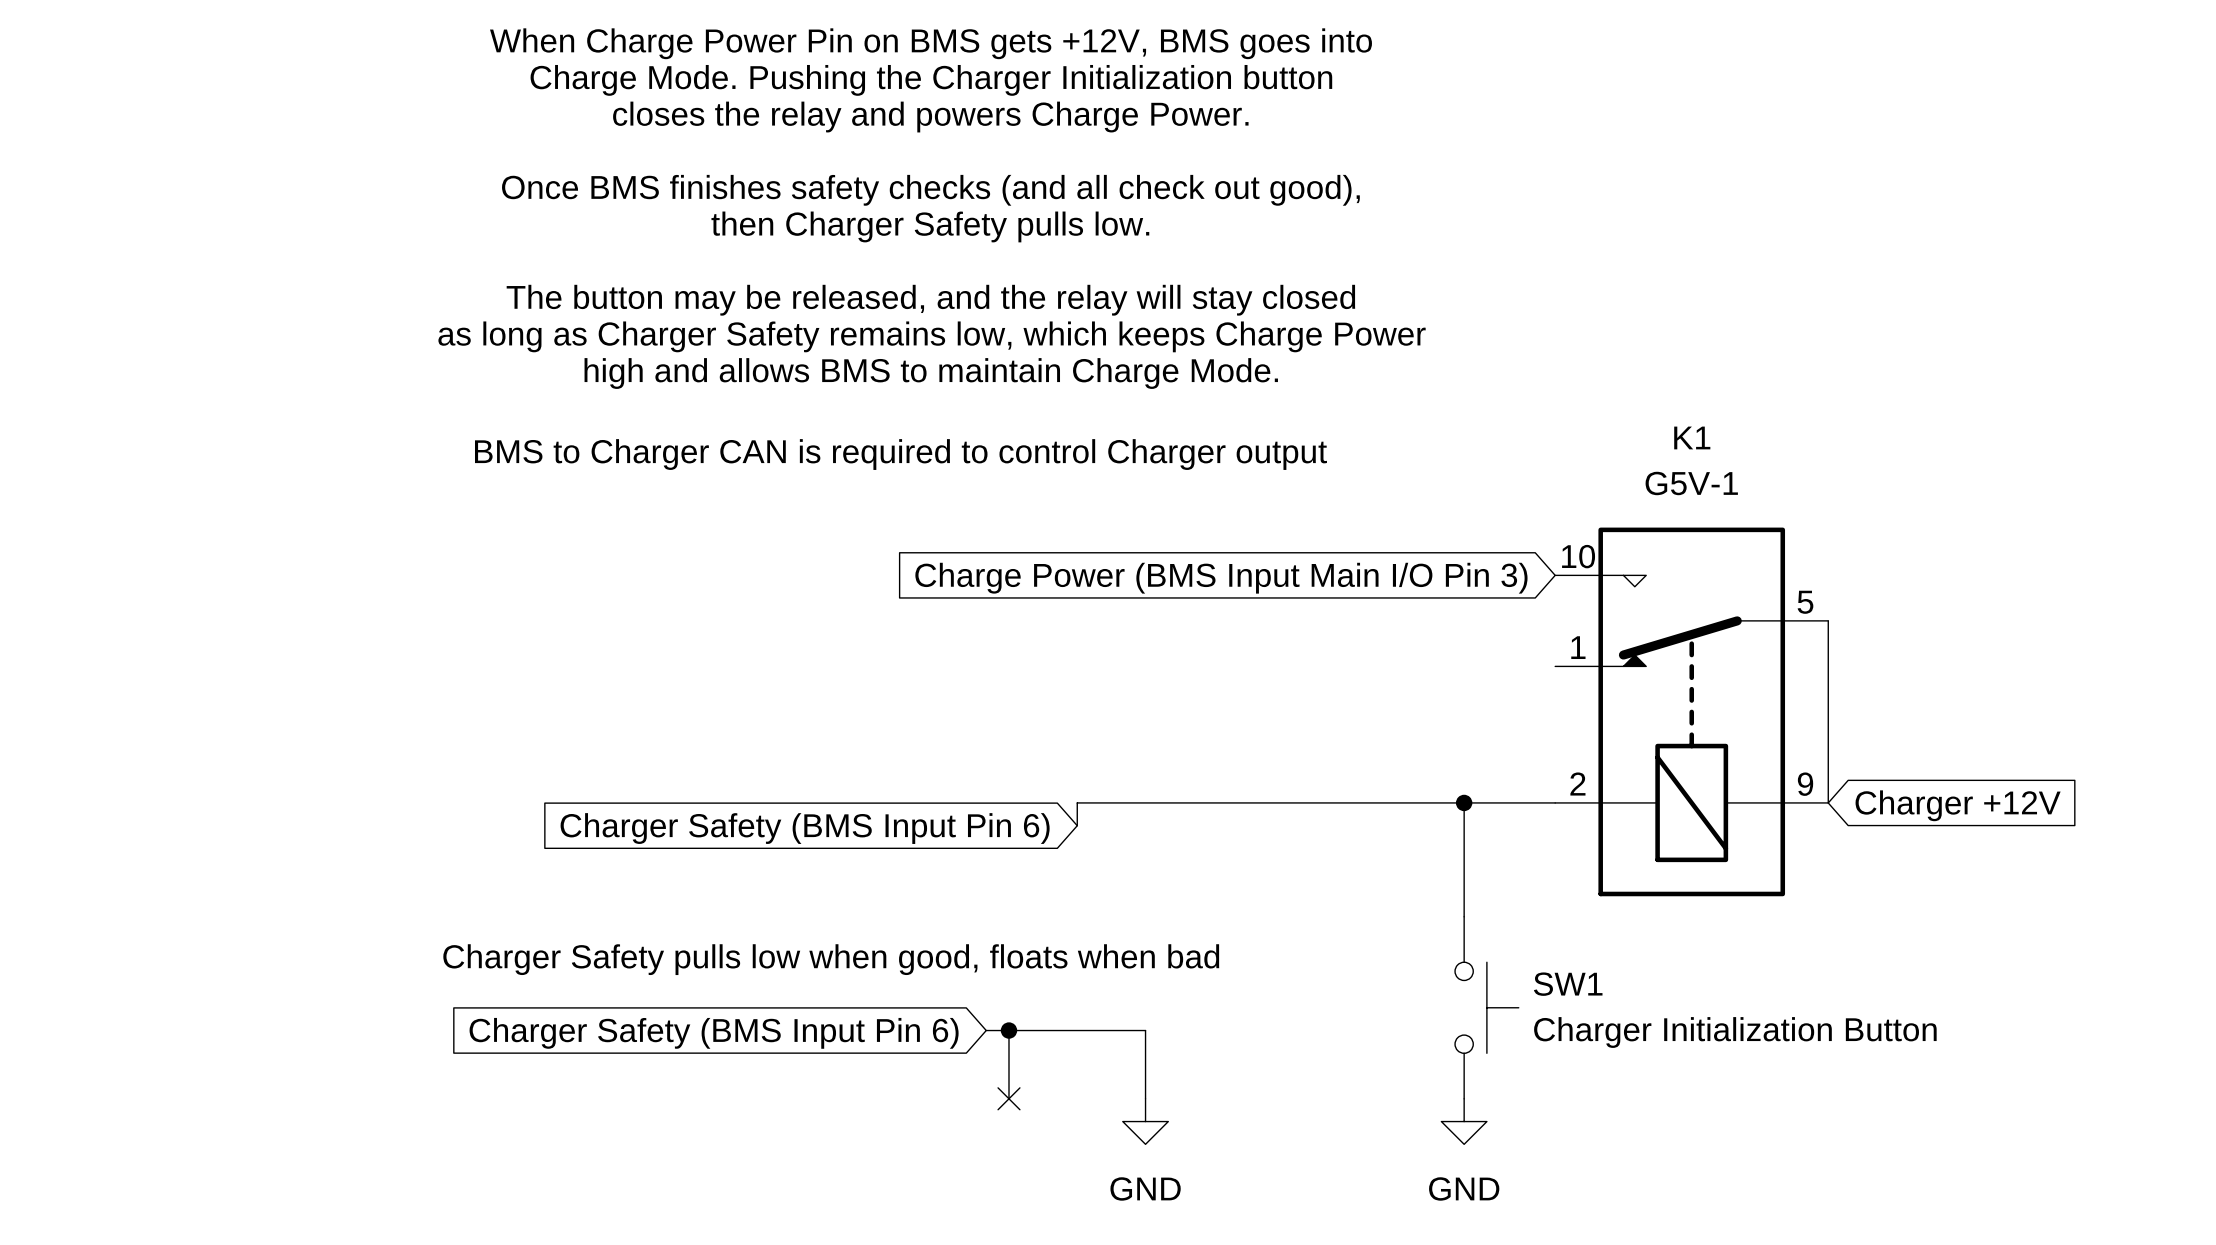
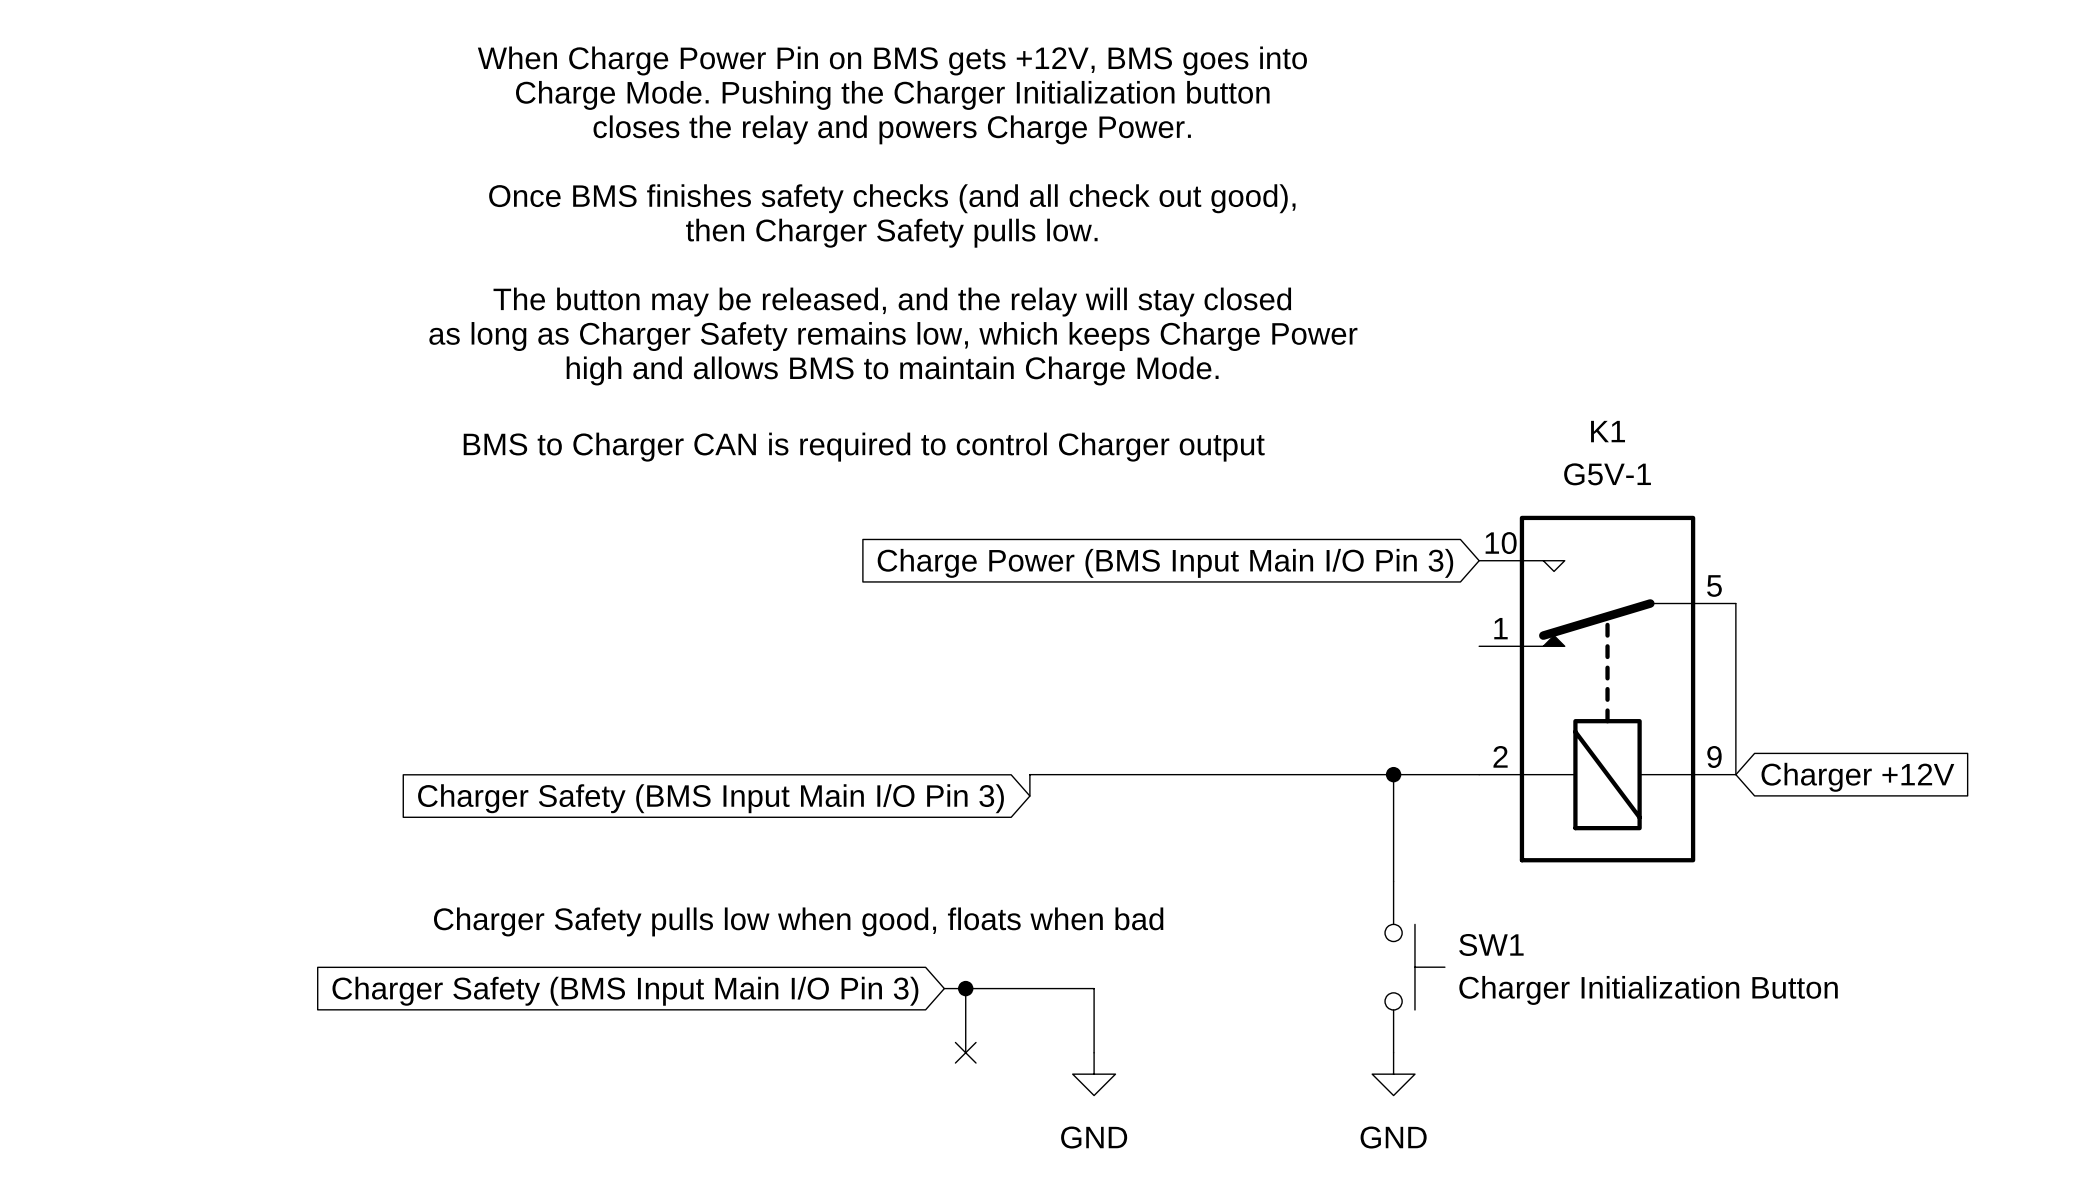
global label: Charger Safety (BMS Input Pin 6) (805, 828) -> Charger Safety (BMS Input Main I/O Pin 3) (710, 798)
global label: Charger Safety (BMS Input Pin 6) (714, 1033) -> Charger Safety (BMS Input Main I/O Pin 3) (625, 991)

